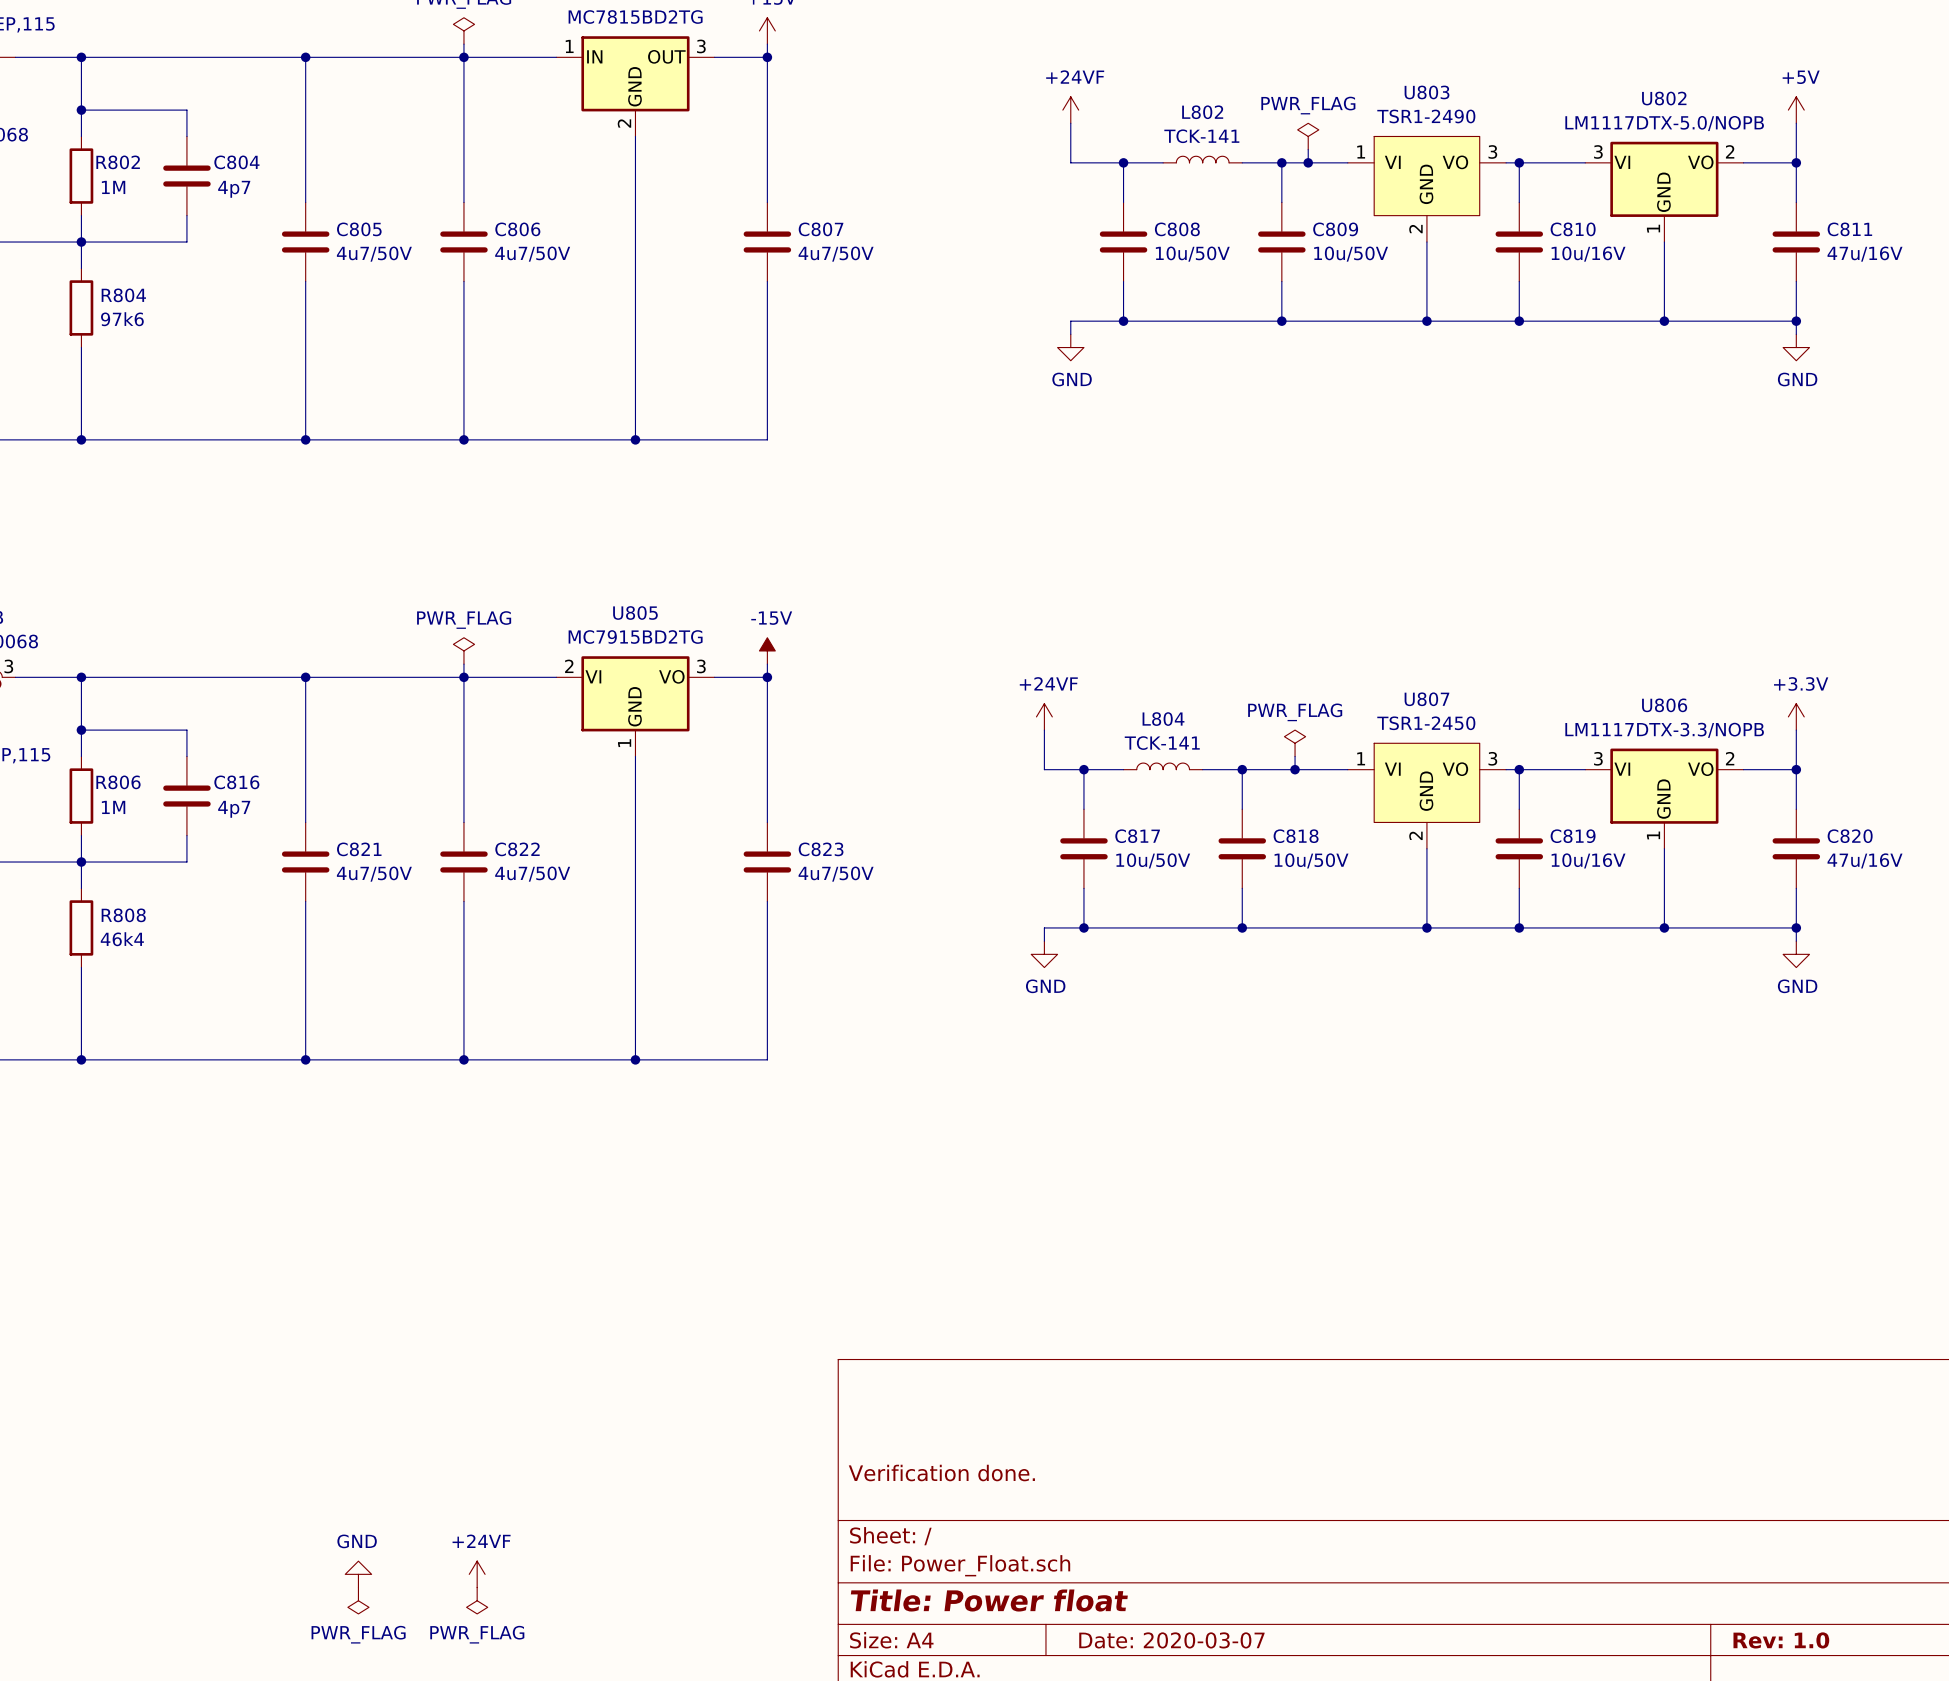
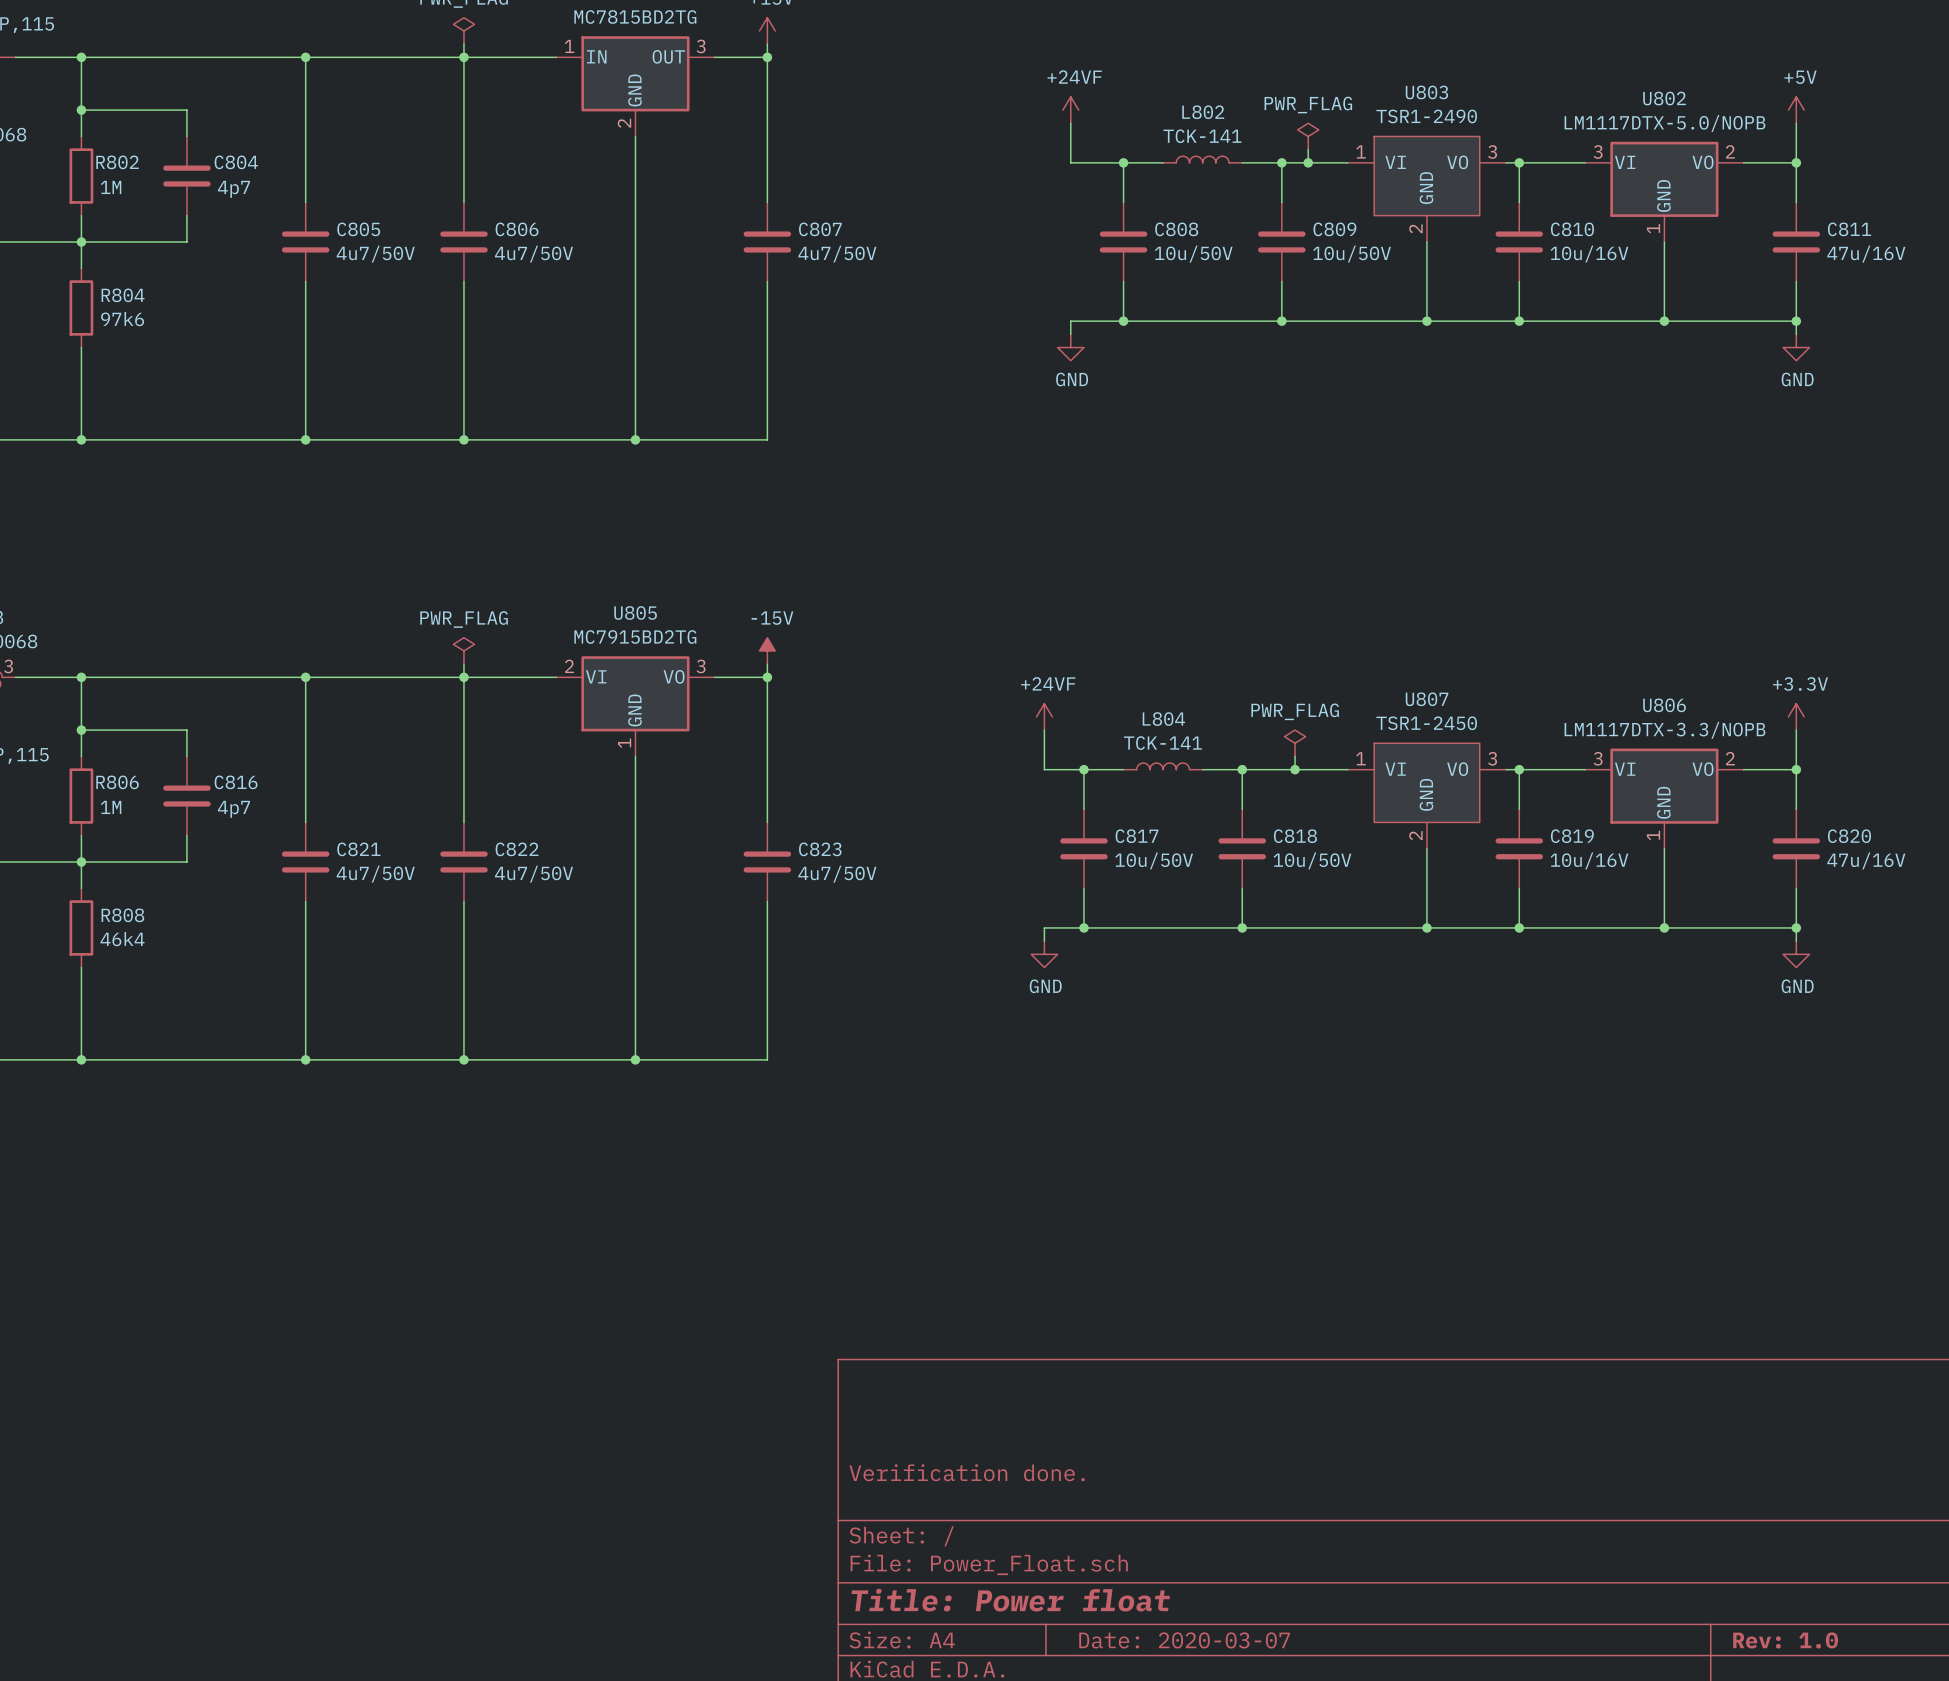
power symbol: GND (358, 1574) -> none
power symbol: +24VF (477, 1574) -> none
power symbol: PWR_FLAG (358, 1600) -> none
power symbol: PWR_FLAG (477, 1600) -> none

